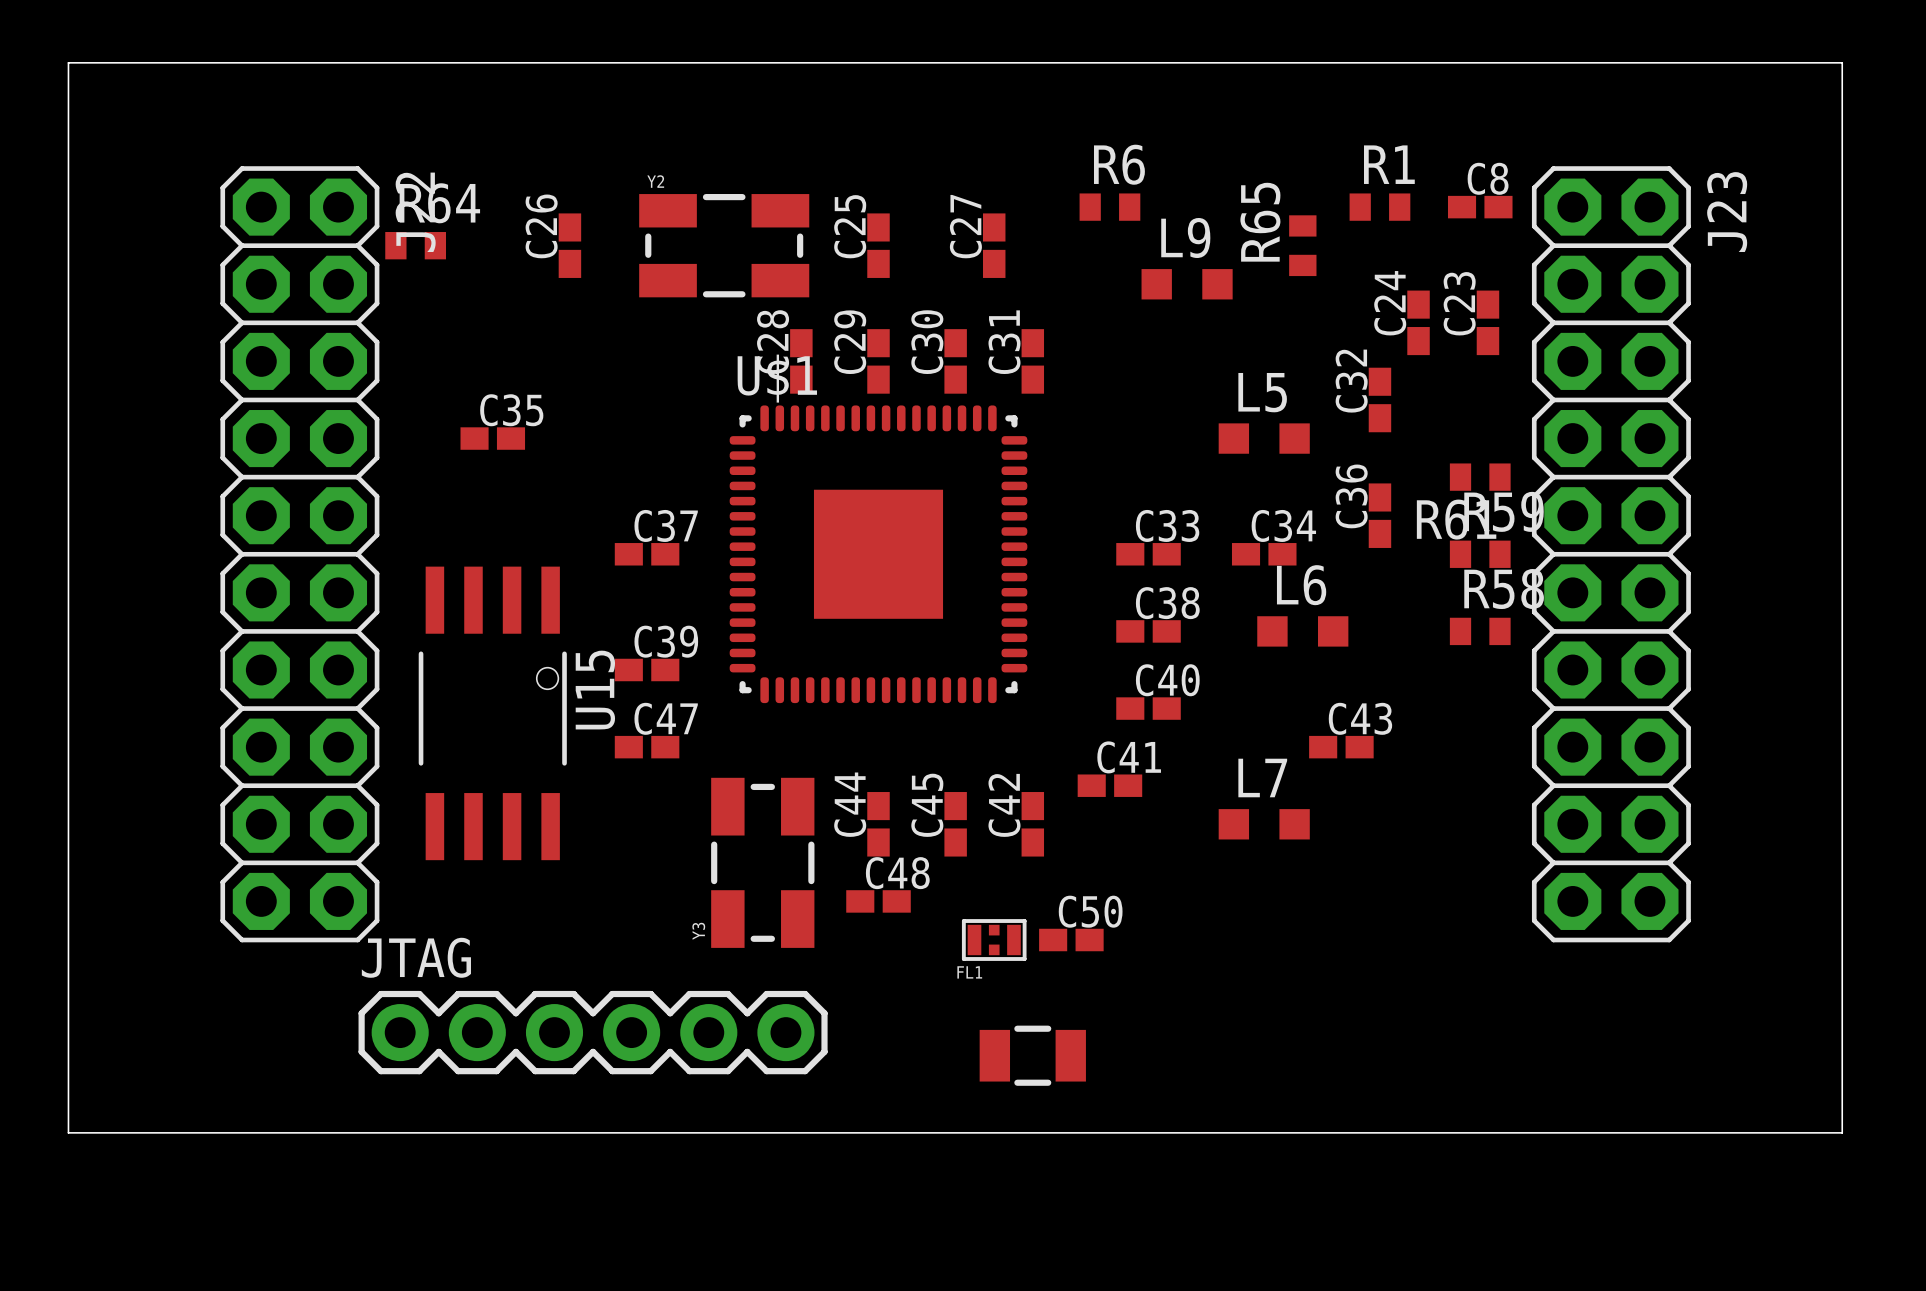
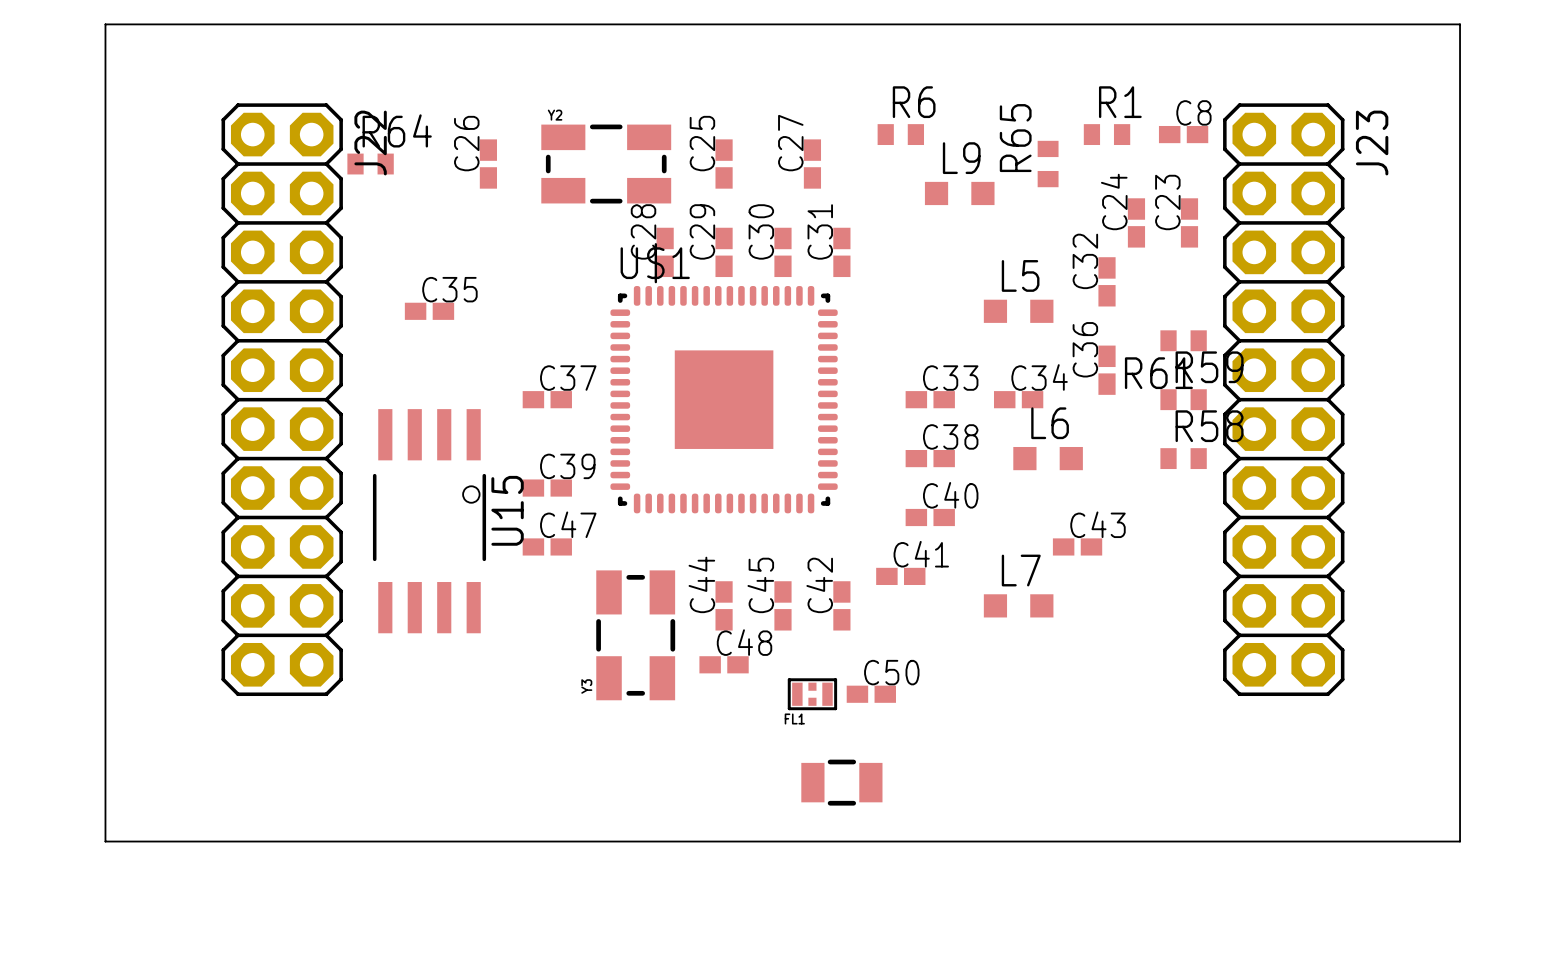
JTAG: (593, 1032) -> none

